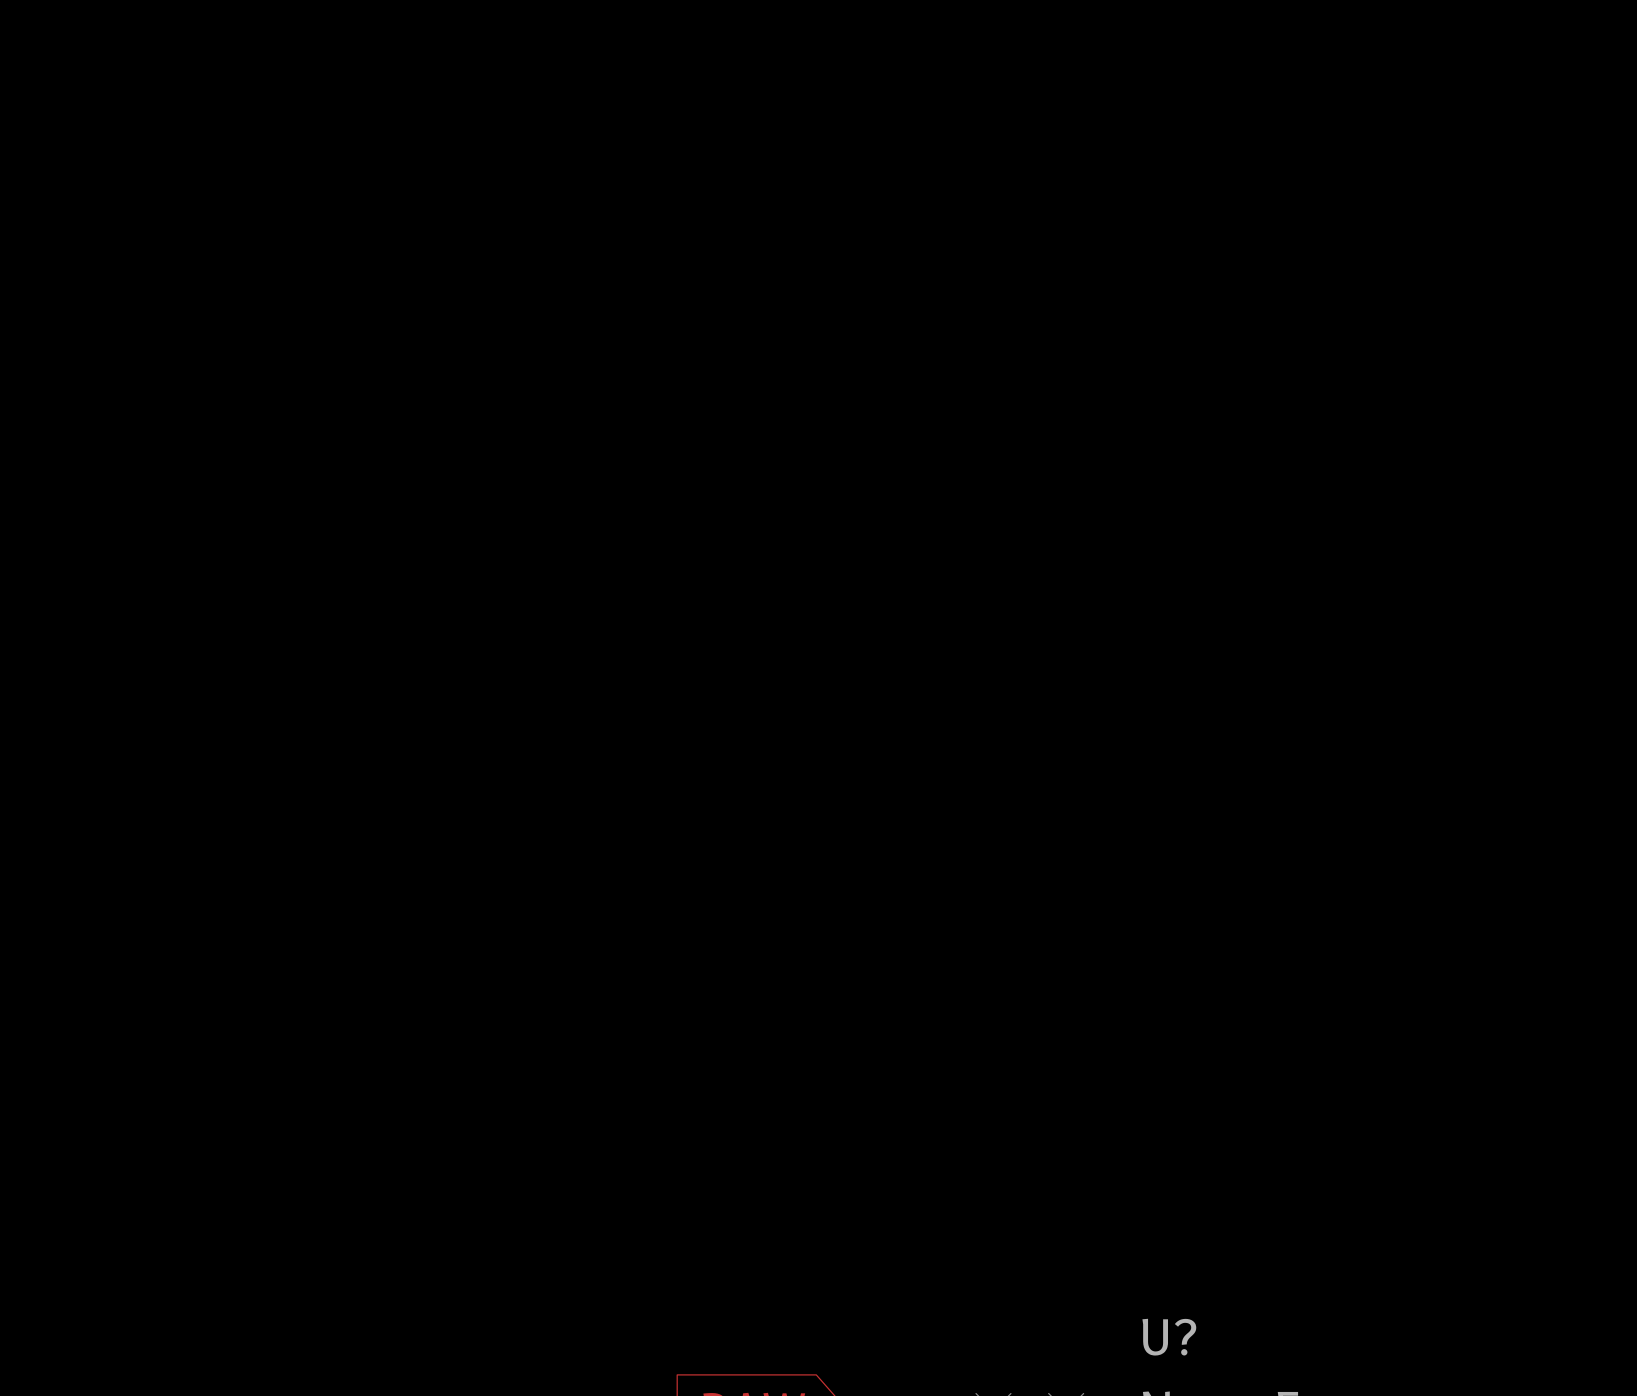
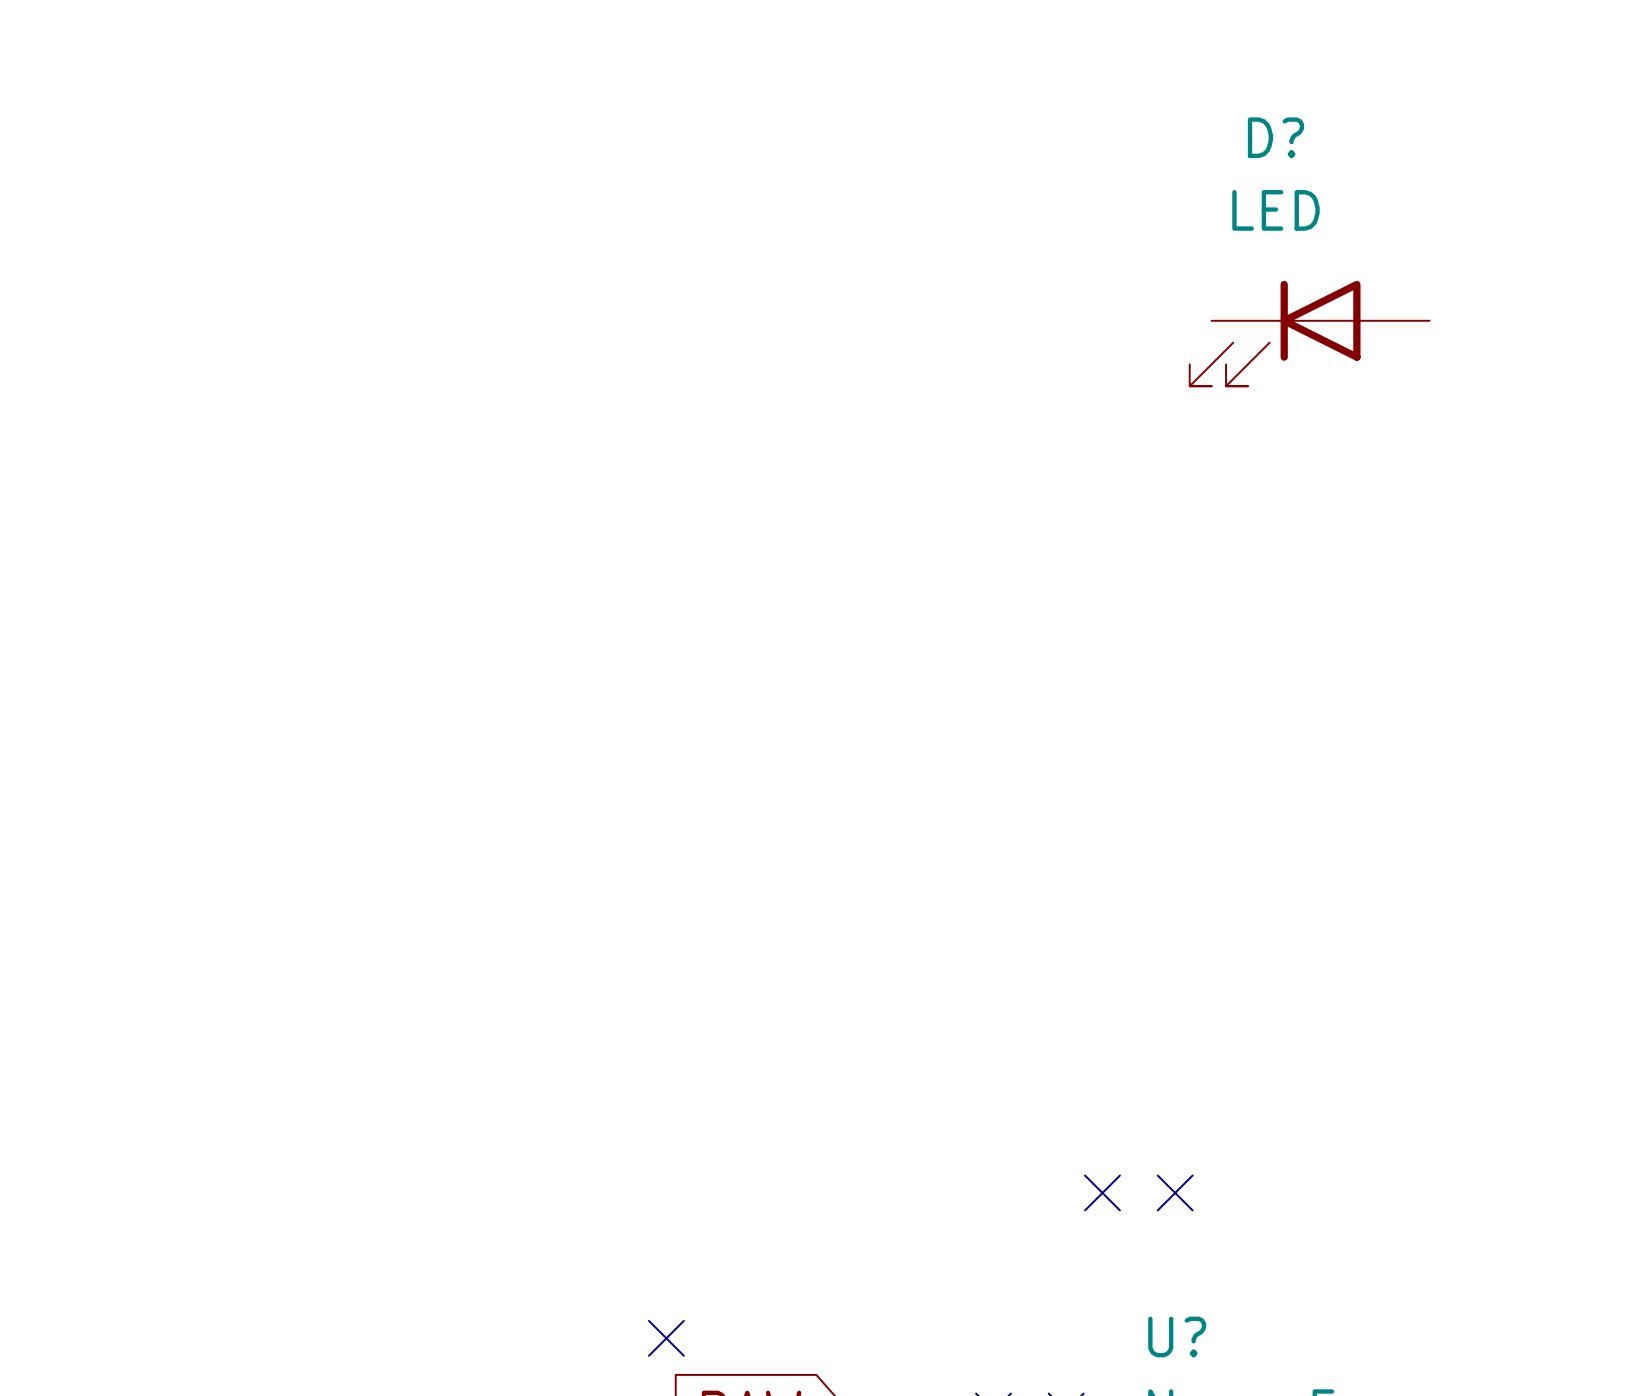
D?: none -> LED (1309, 333)
no-connect mark: none -> (1102, 1192)
no-connect mark: none -> (1175, 1192)
no-connect mark: none -> (666, 1338)

